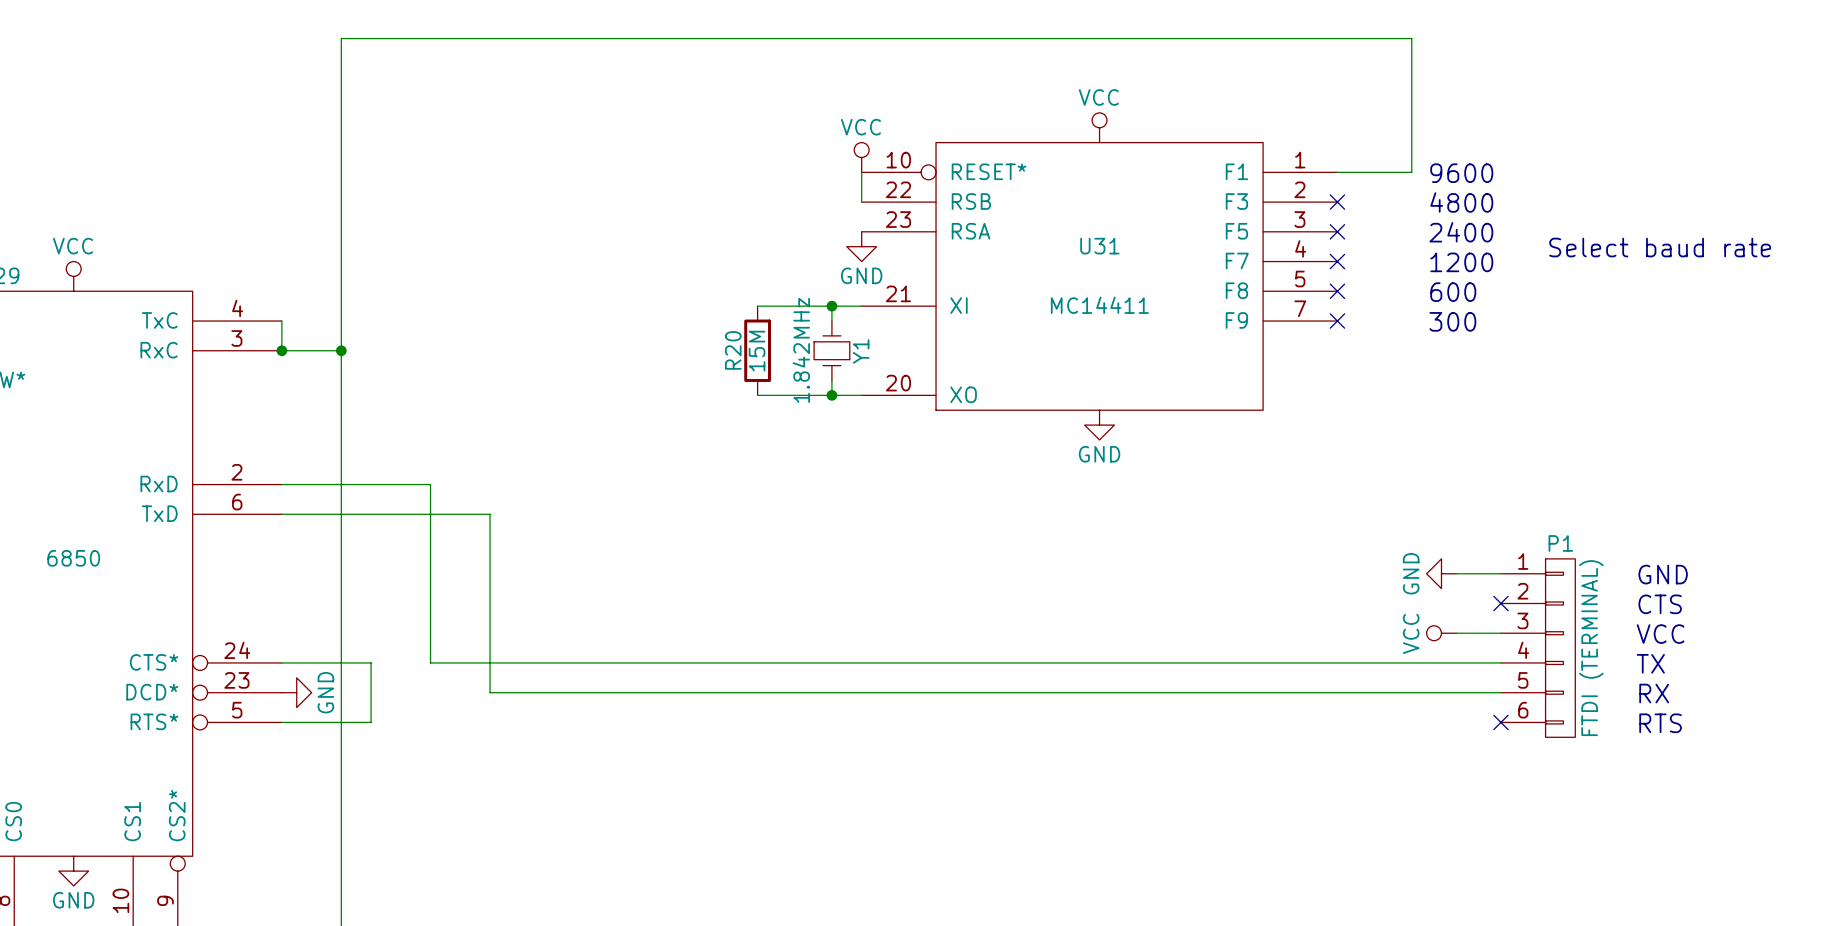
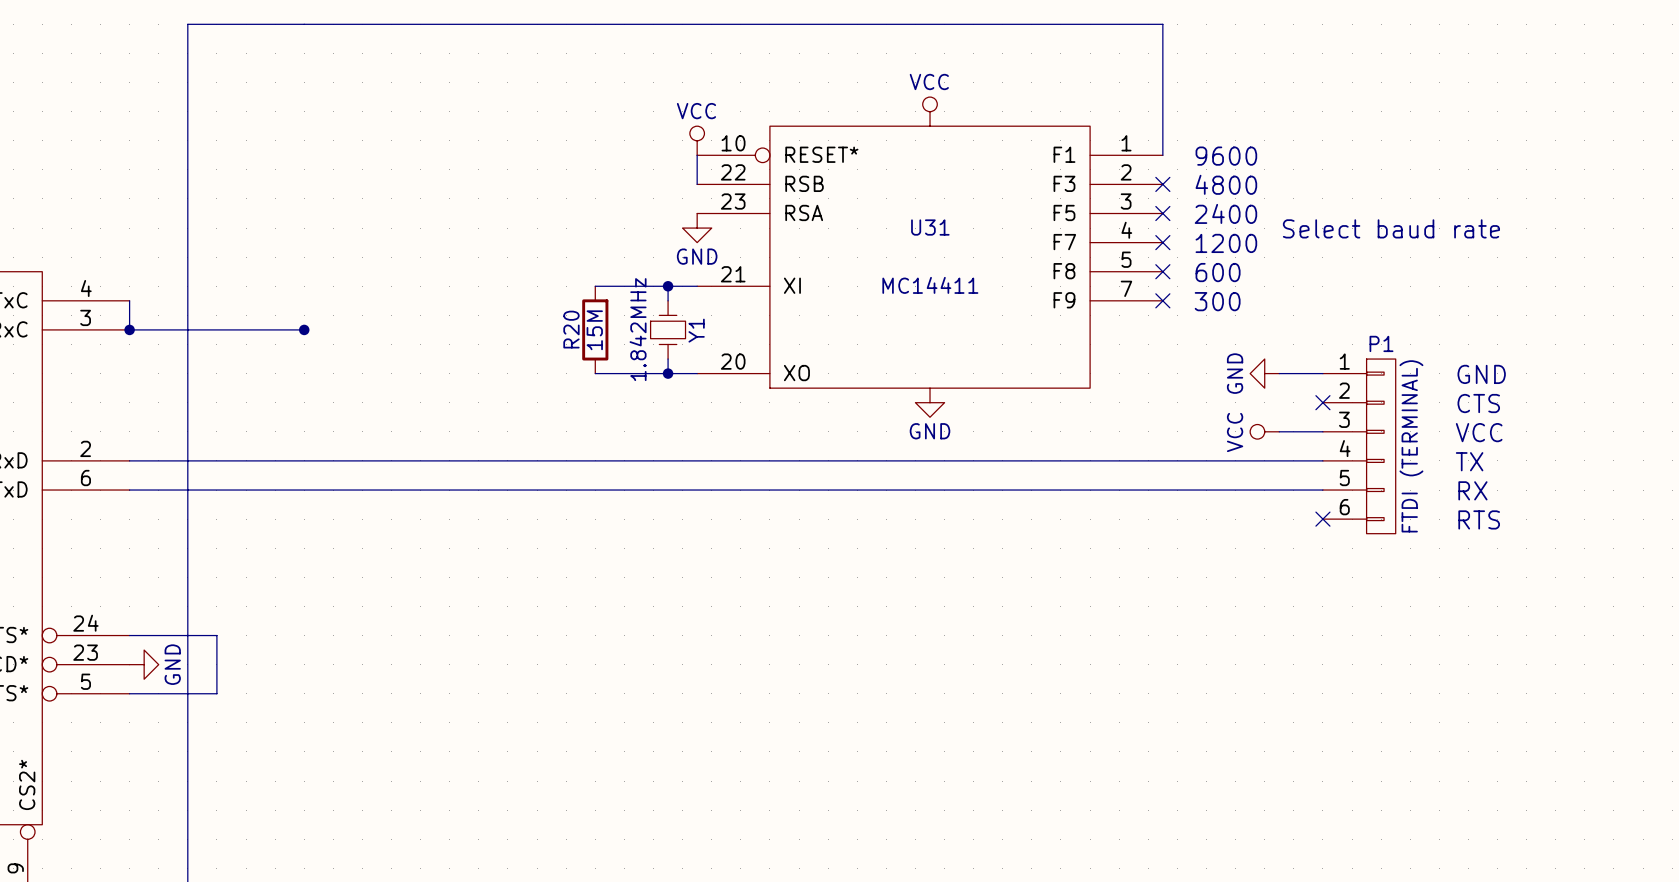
wire: (1337, 38) (1411, 38) (1411, 172) (1337, 172) -> (1162, 24) (1162, 155)
text position: 9600 (1461, 173) -> 9600 (1226, 156)
text position: 4800 (1461, 202) -> 4800 (1226, 184)
text position: 2400 (1461, 232) -> 2400 (1225, 213)
text position: Select baud rate (1660, 247) -> Select baud rate (1391, 228)
text position: 1200 (1461, 262) -> 1200 (1226, 243)
text position: 600 (1453, 292) -> 600 (1218, 272)
text position: 300 (1452, 321) -> 300 (1217, 301)
wire: none -> (187, 329) (304, 329)
junction: (341, 350) -> none
junction: none -> (304, 329)
no-connect mark: none -> (1322, 402)
wire: (430, 484) (430, 662) (1500, 662) -> (275, 460) (1322, 460)
wire: (489, 514) (489, 692) (1500, 692) -> (333, 490) (1322, 490)
power symbol position: GND (1441, 573) -> GND (1264, 373)
wire: (1456, 573) (1500, 573) -> (1279, 373) (1322, 373)
text position: GND (1663, 574) -> GND (1481, 374)
no-connect mark position: (1500, 603) -> (1322, 519)
text position: CTS (1660, 604) -> CTS (1478, 403)
power symbol position: VCC (1441, 633) -> VCC (1264, 431)
wire: (1456, 633) (1500, 633) -> (1279, 431) (1322, 431)
text position: VCC (1660, 634) -> VCC (1479, 432)
P1 position: (1538, 648) -> (1359, 446)
text position: TX (1650, 663) -> TX (1469, 461)
text position: RX (1654, 693) -> RX (1472, 490)
no-connect mark: (1500, 722) -> none
text position: RTS (1660, 723) -> RTS (1479, 519)

